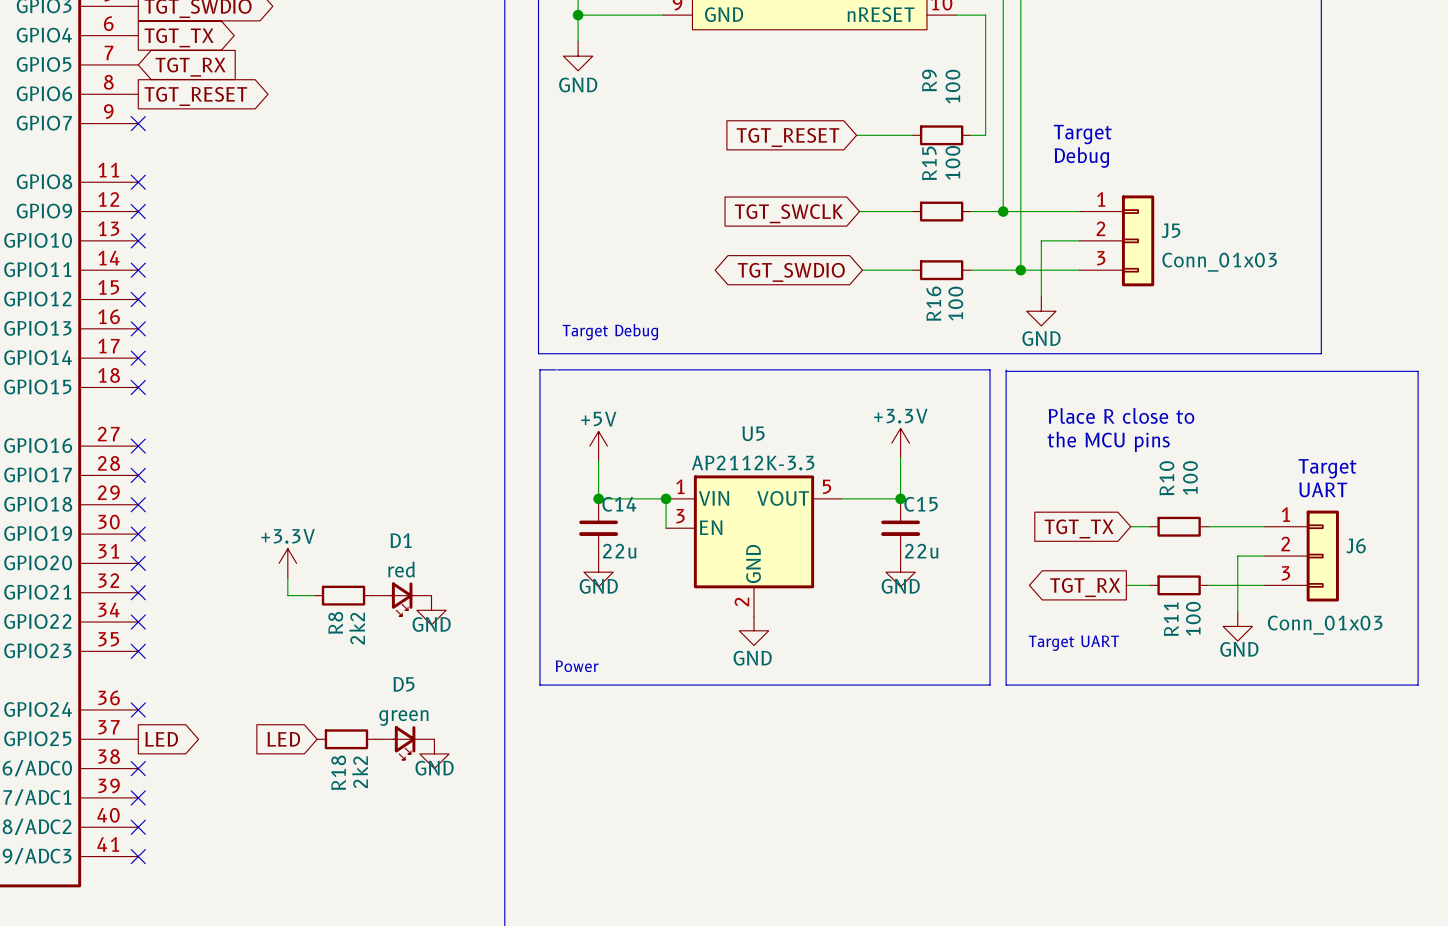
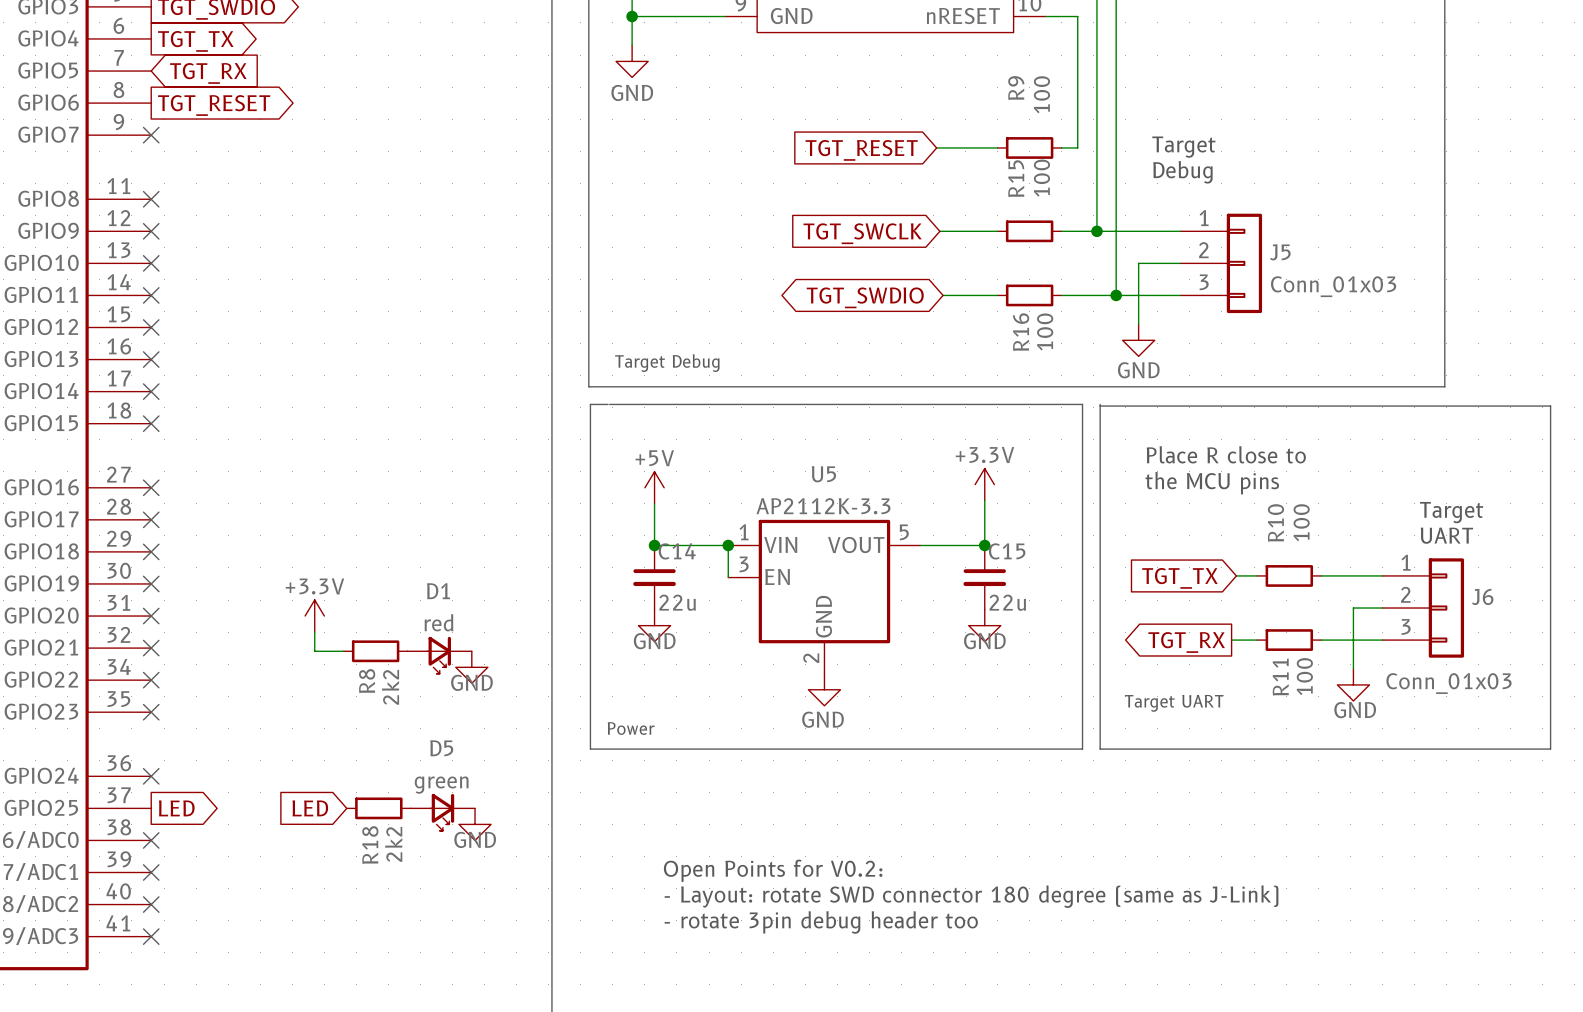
text: none -> Open Points for V0.2: (773, 870)
text: none -> - Layout: rotate SWD connector 180 degree (same as J-Link) (971, 896)
text: none -> - rotate 3pin debug header too (821, 922)

